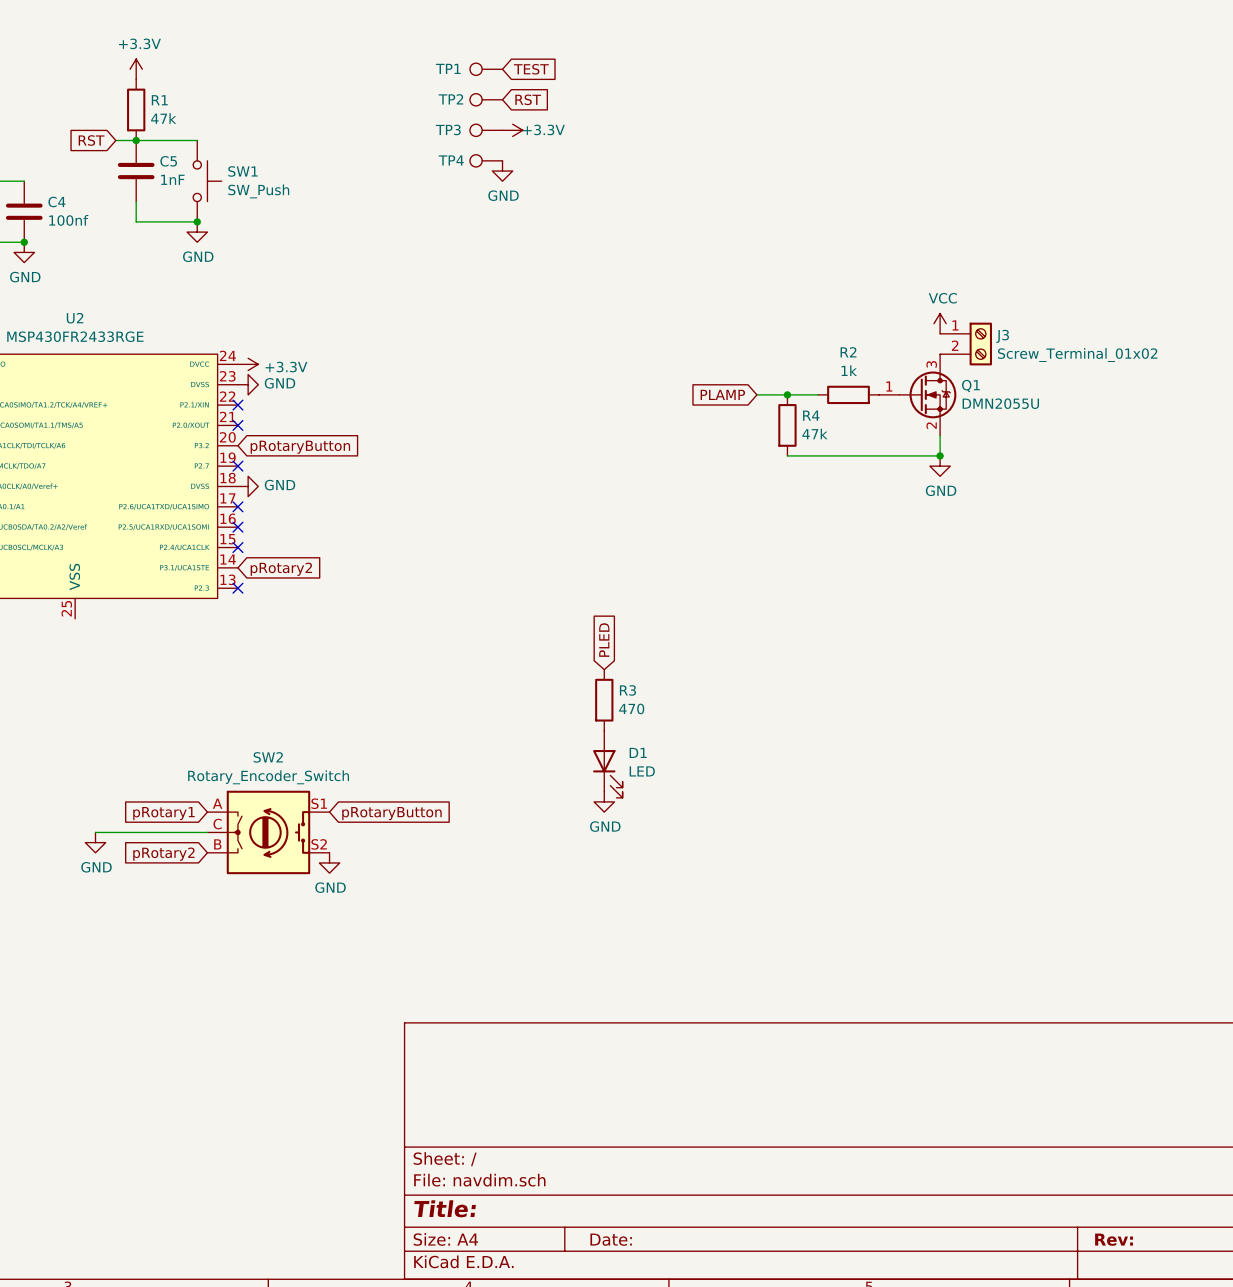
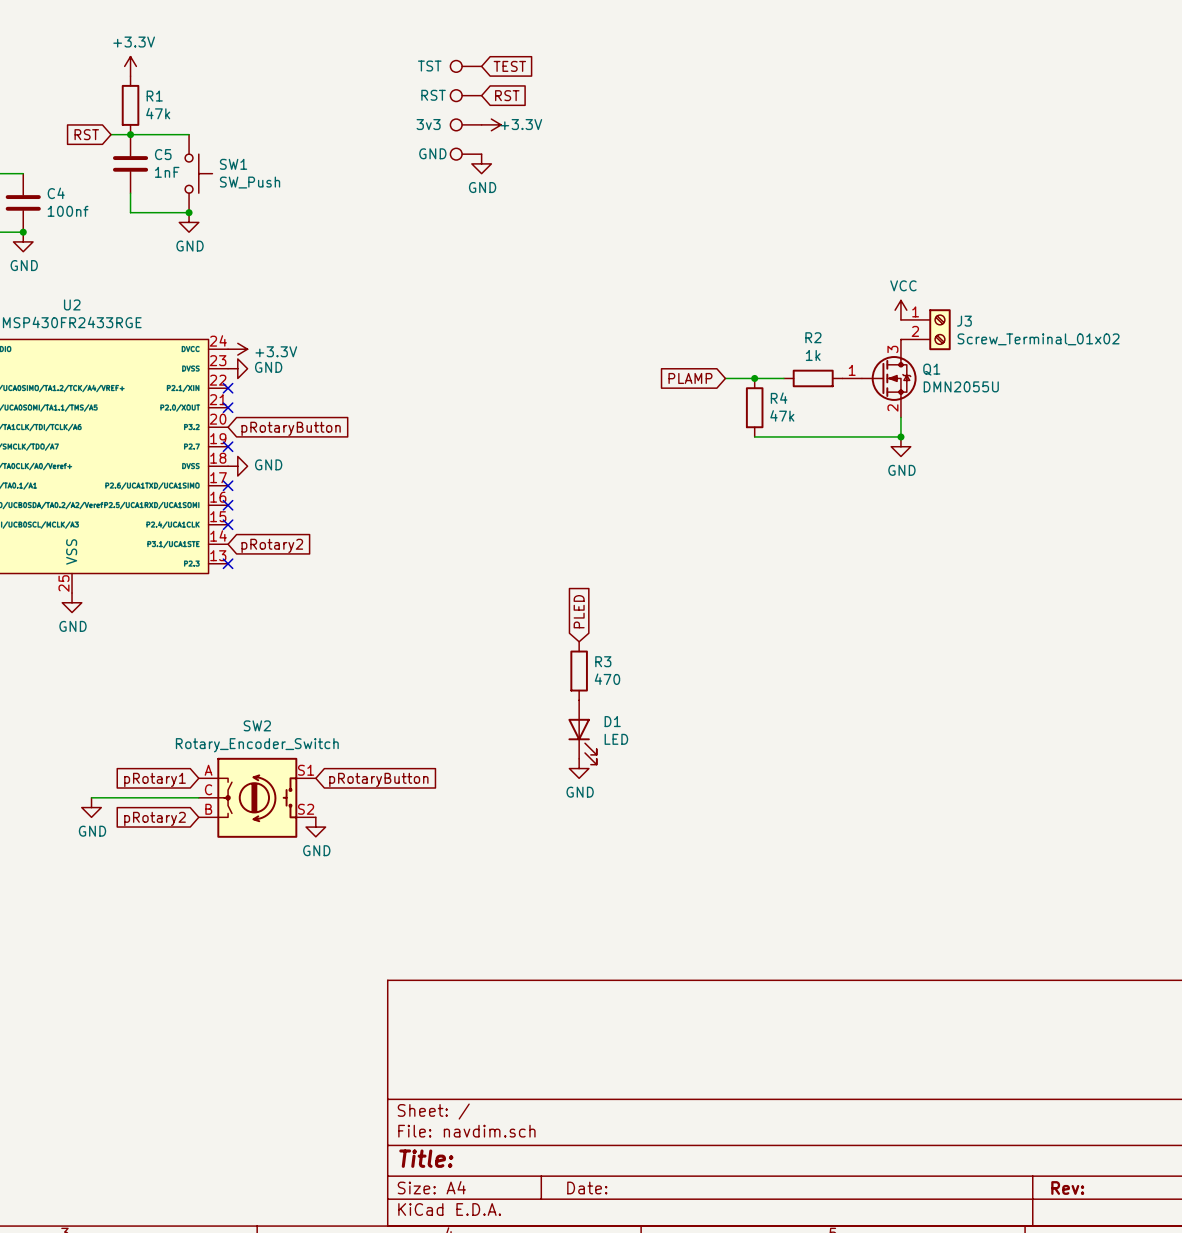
TP1 name: TP1 (448, 68) -> TST (429, 66)
TP2 name: TP2 (450, 99) -> RST (433, 95)
TP3 name: TP3 (448, 129) -> 3v3 (428, 124)
TP4 name: TP4 (451, 160) -> GND (432, 153)
power symbol: none -> GND (72, 602)

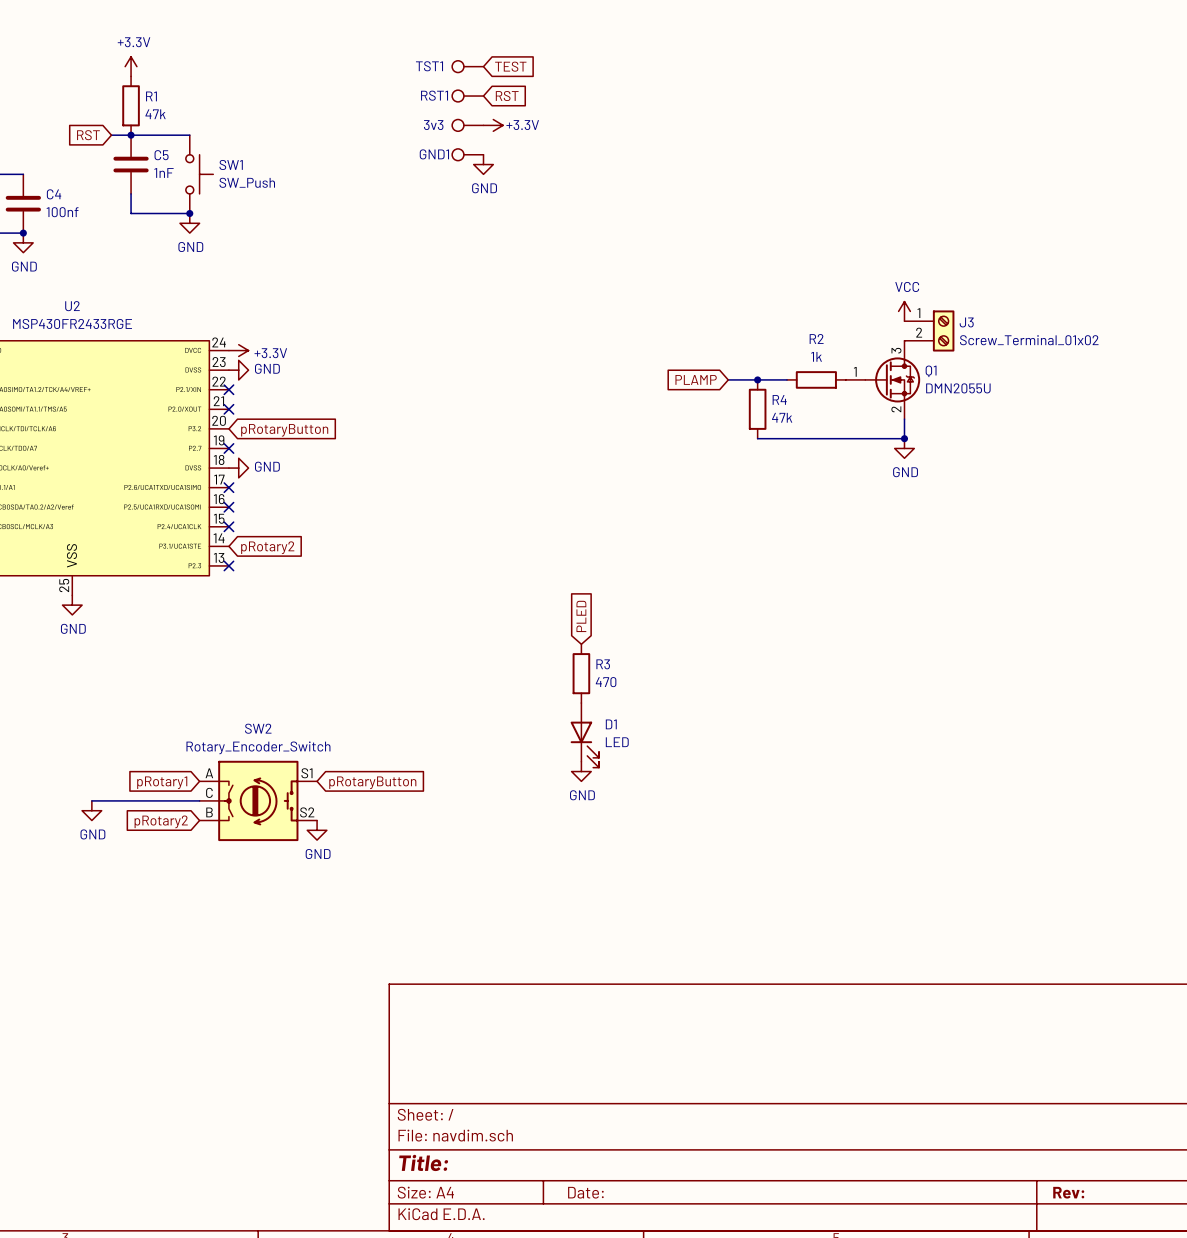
TST name: TST (429, 66) -> TST1 (429, 66)
RST name: RST (433, 95) -> RST1 (434, 95)
GND name: GND (432, 153) -> GND1 (434, 154)

